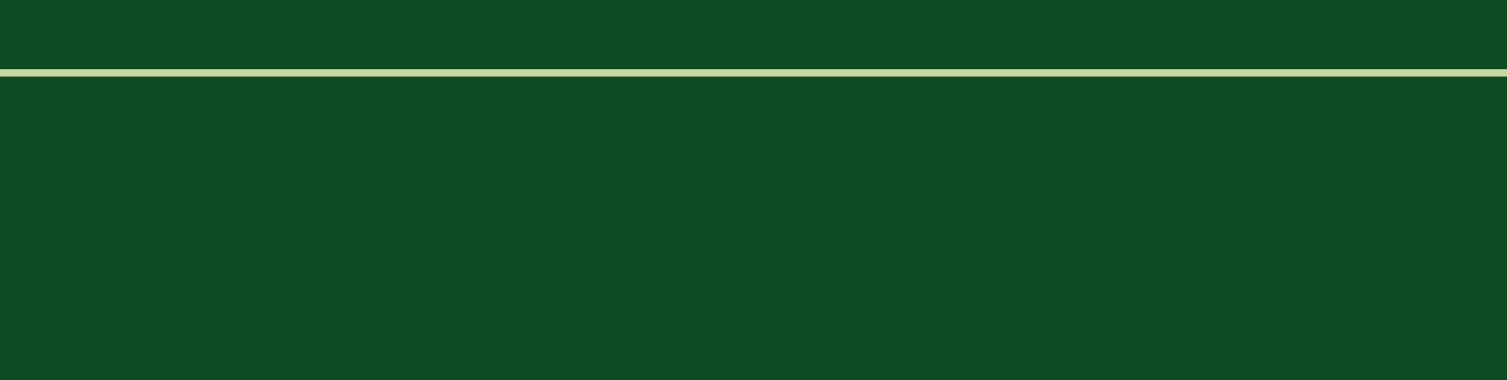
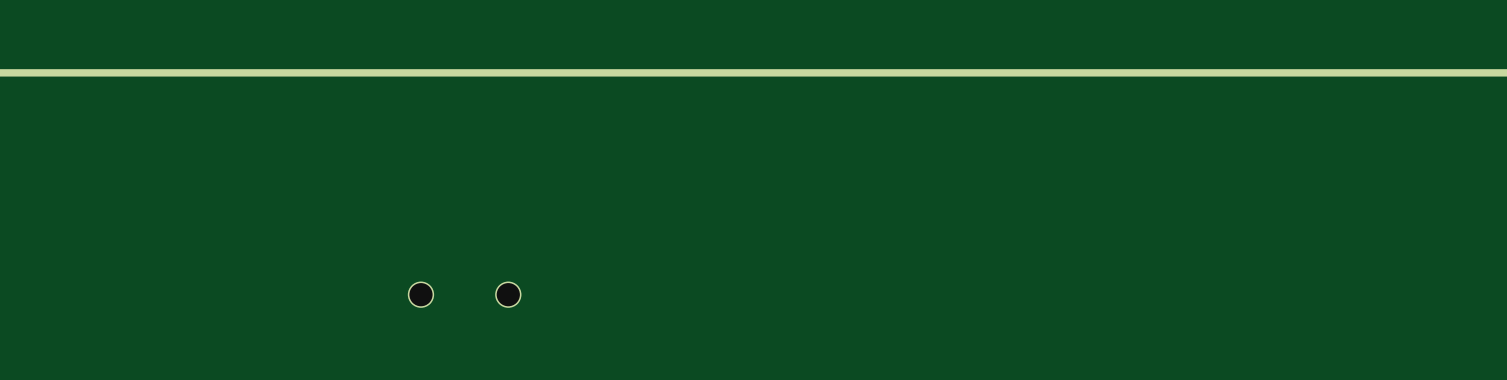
part: none -> (464, 294)

